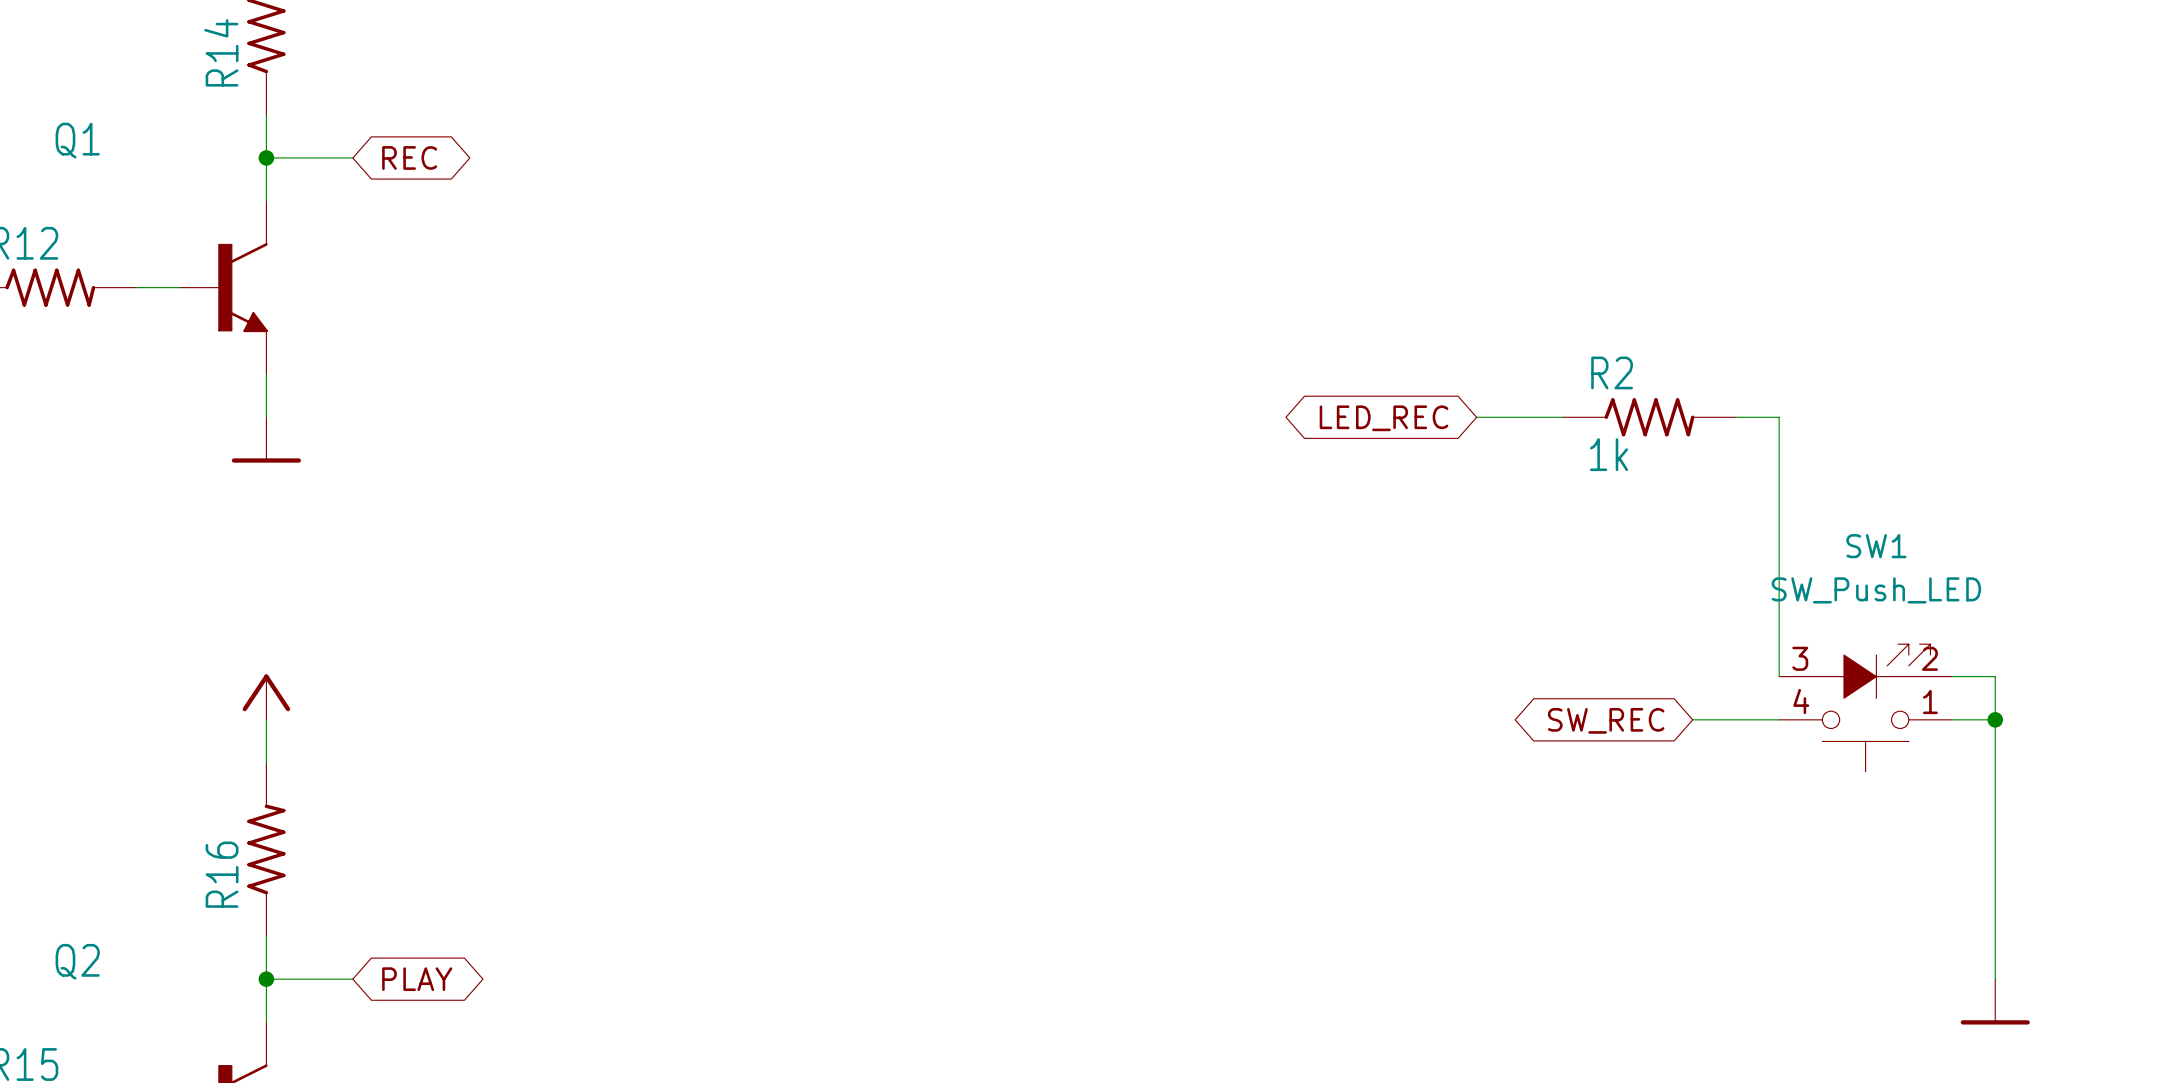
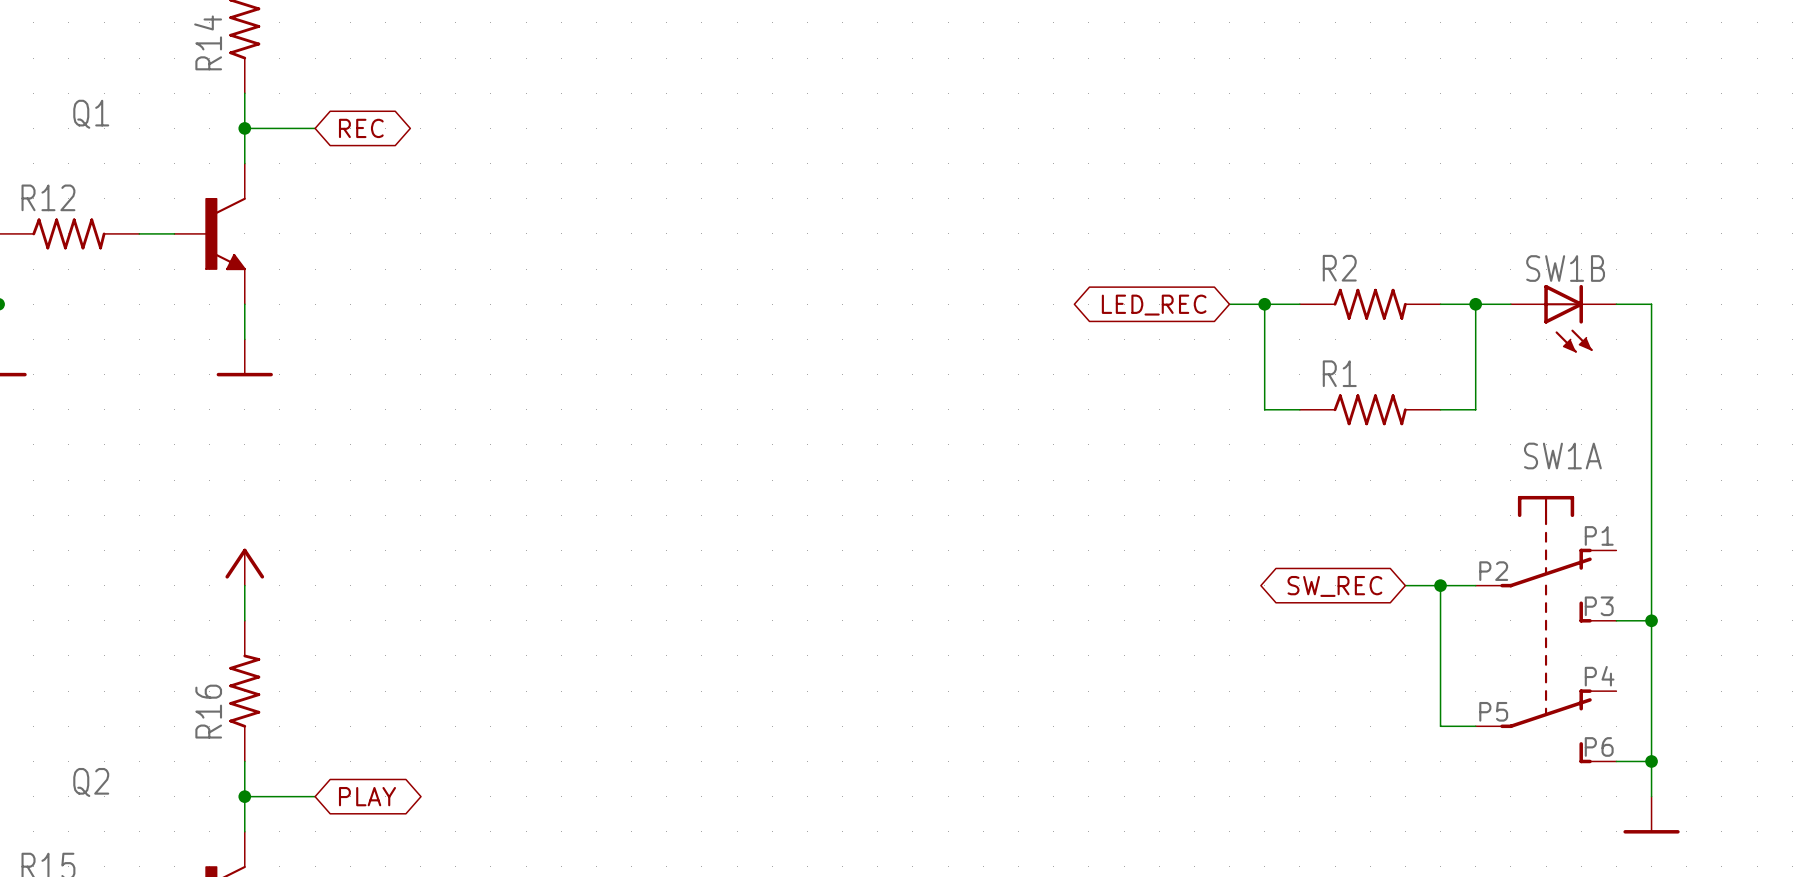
wire: none -> (1264, 304) (1264, 409) (1299, 409)
junction: none -> (1264, 304)
wire: none -> (1440, 304) (1510, 304)
junction: none -> (1475, 304)
SW1B: none -> (1563, 318)
wire: (1476, 417) (1563, 417) -> (1229, 304) (1299, 304)
R2 position: (1649, 417) -> (1370, 304)
wire: (1735, 417) (1779, 417) -> (1475, 304) (1475, 339)
global label position: LED_REC (1384, 418) -> LED_REC (1154, 305)
R2 value: 1k (1609, 454) -> none
R1: none -> (1370, 409)
wire: (1779, 503) (1779, 676) -> (1475, 409) (1440, 409)
wire: (1952, 676) (1995, 676) -> (1616, 304) (1651, 304) (1651, 550)
SW1: SW_Push_LED (1865, 707) -> none
wire: none -> (1440, 585) (1440, 726) (1475, 726)
junction: none -> (1440, 585)
wire: (1952, 719) (1995, 719) -> (1616, 620) (1651, 620)
junction position: (1995, 719) -> (1651, 620)
SW1A: none -> (1546, 629)
wire: none -> (1616, 761) (1651, 761)
junction: none -> (1651, 761)

